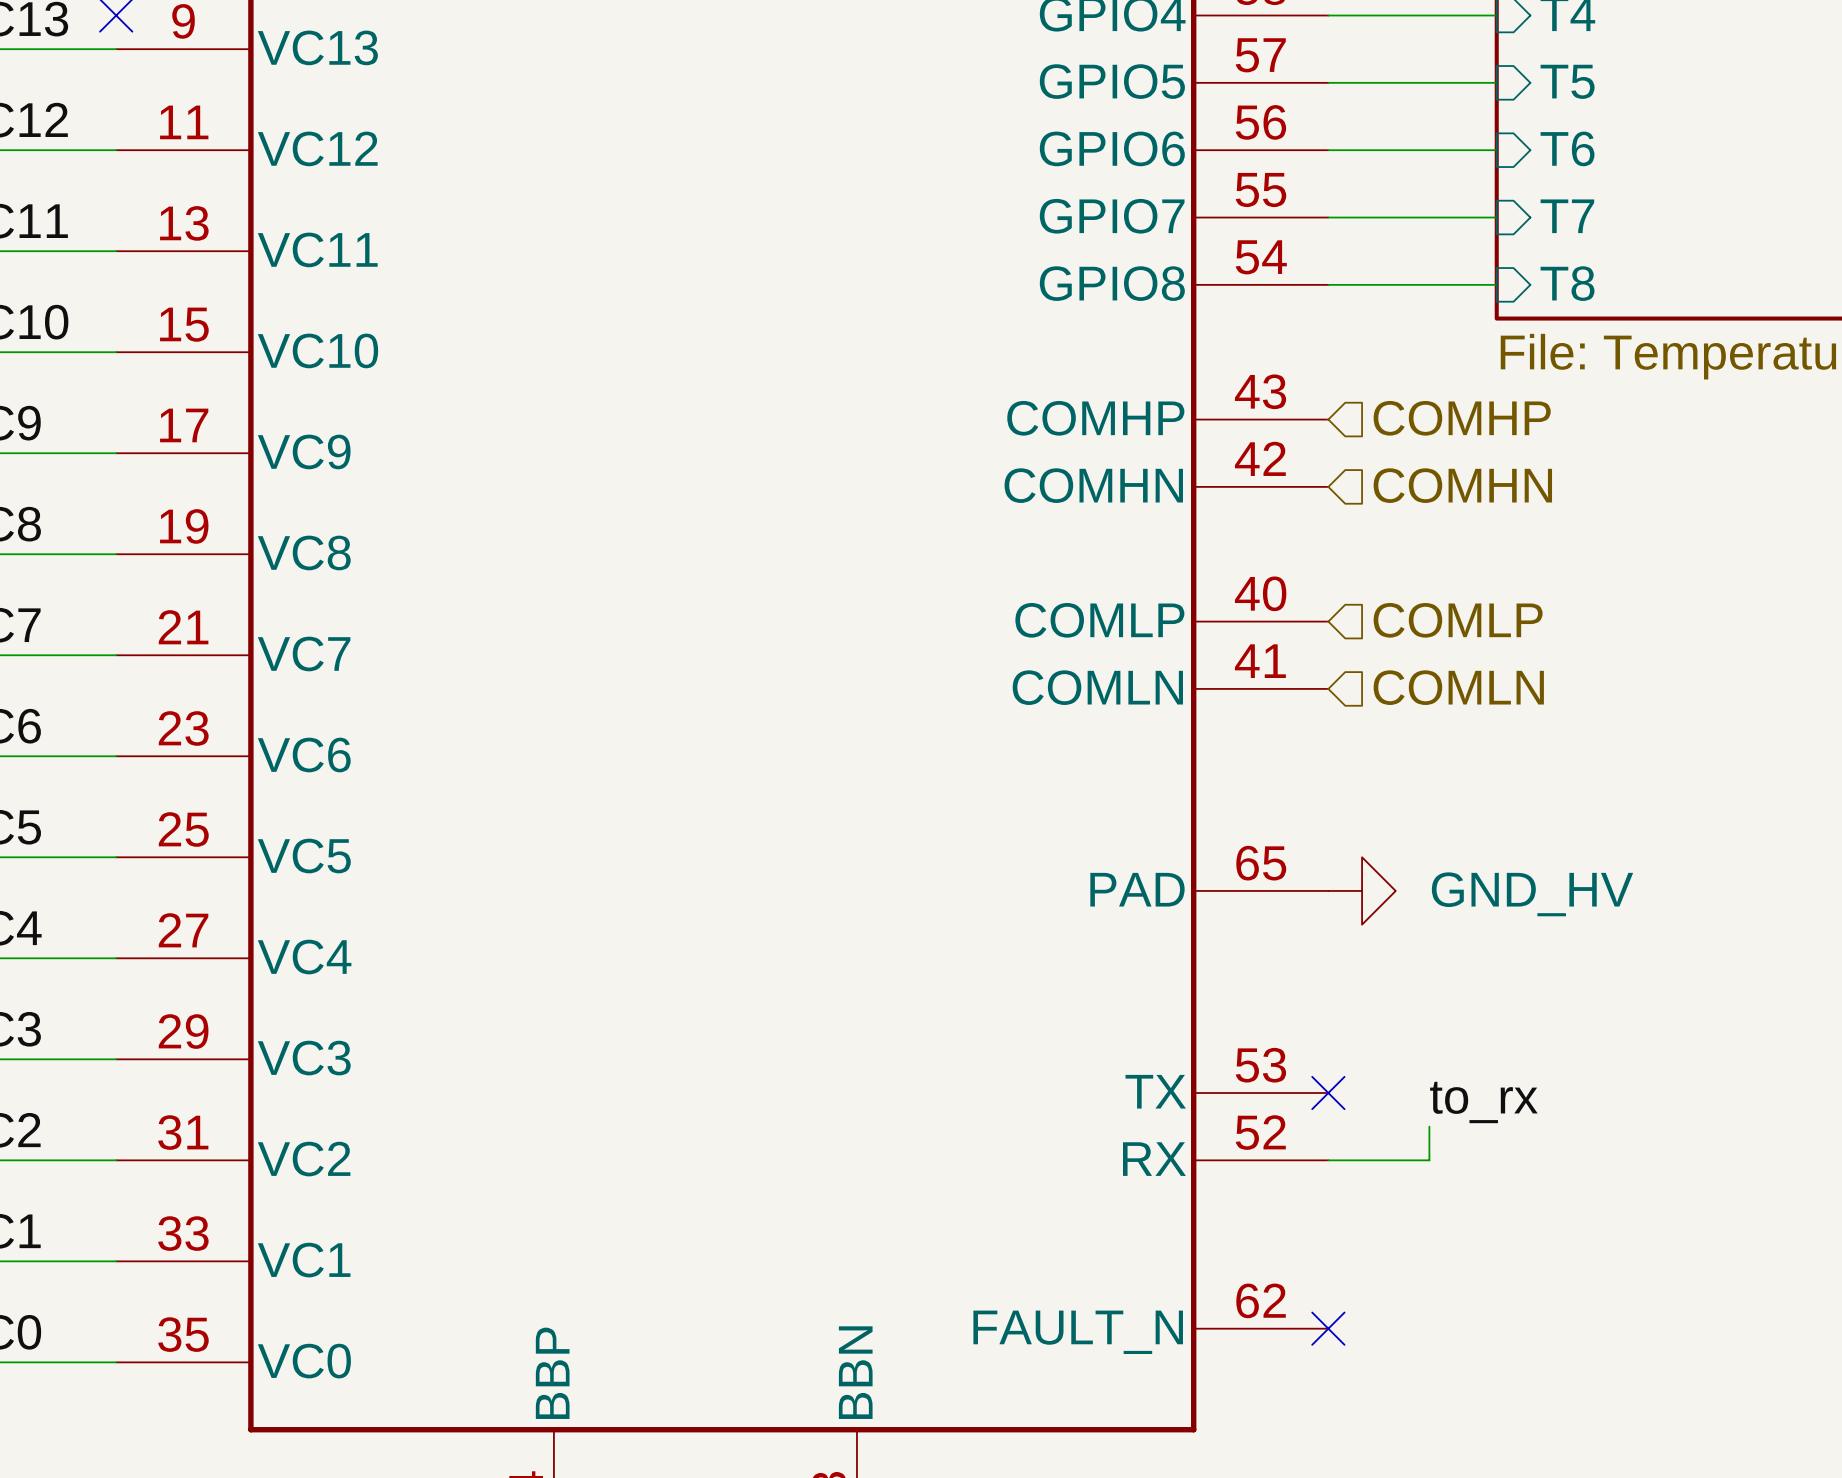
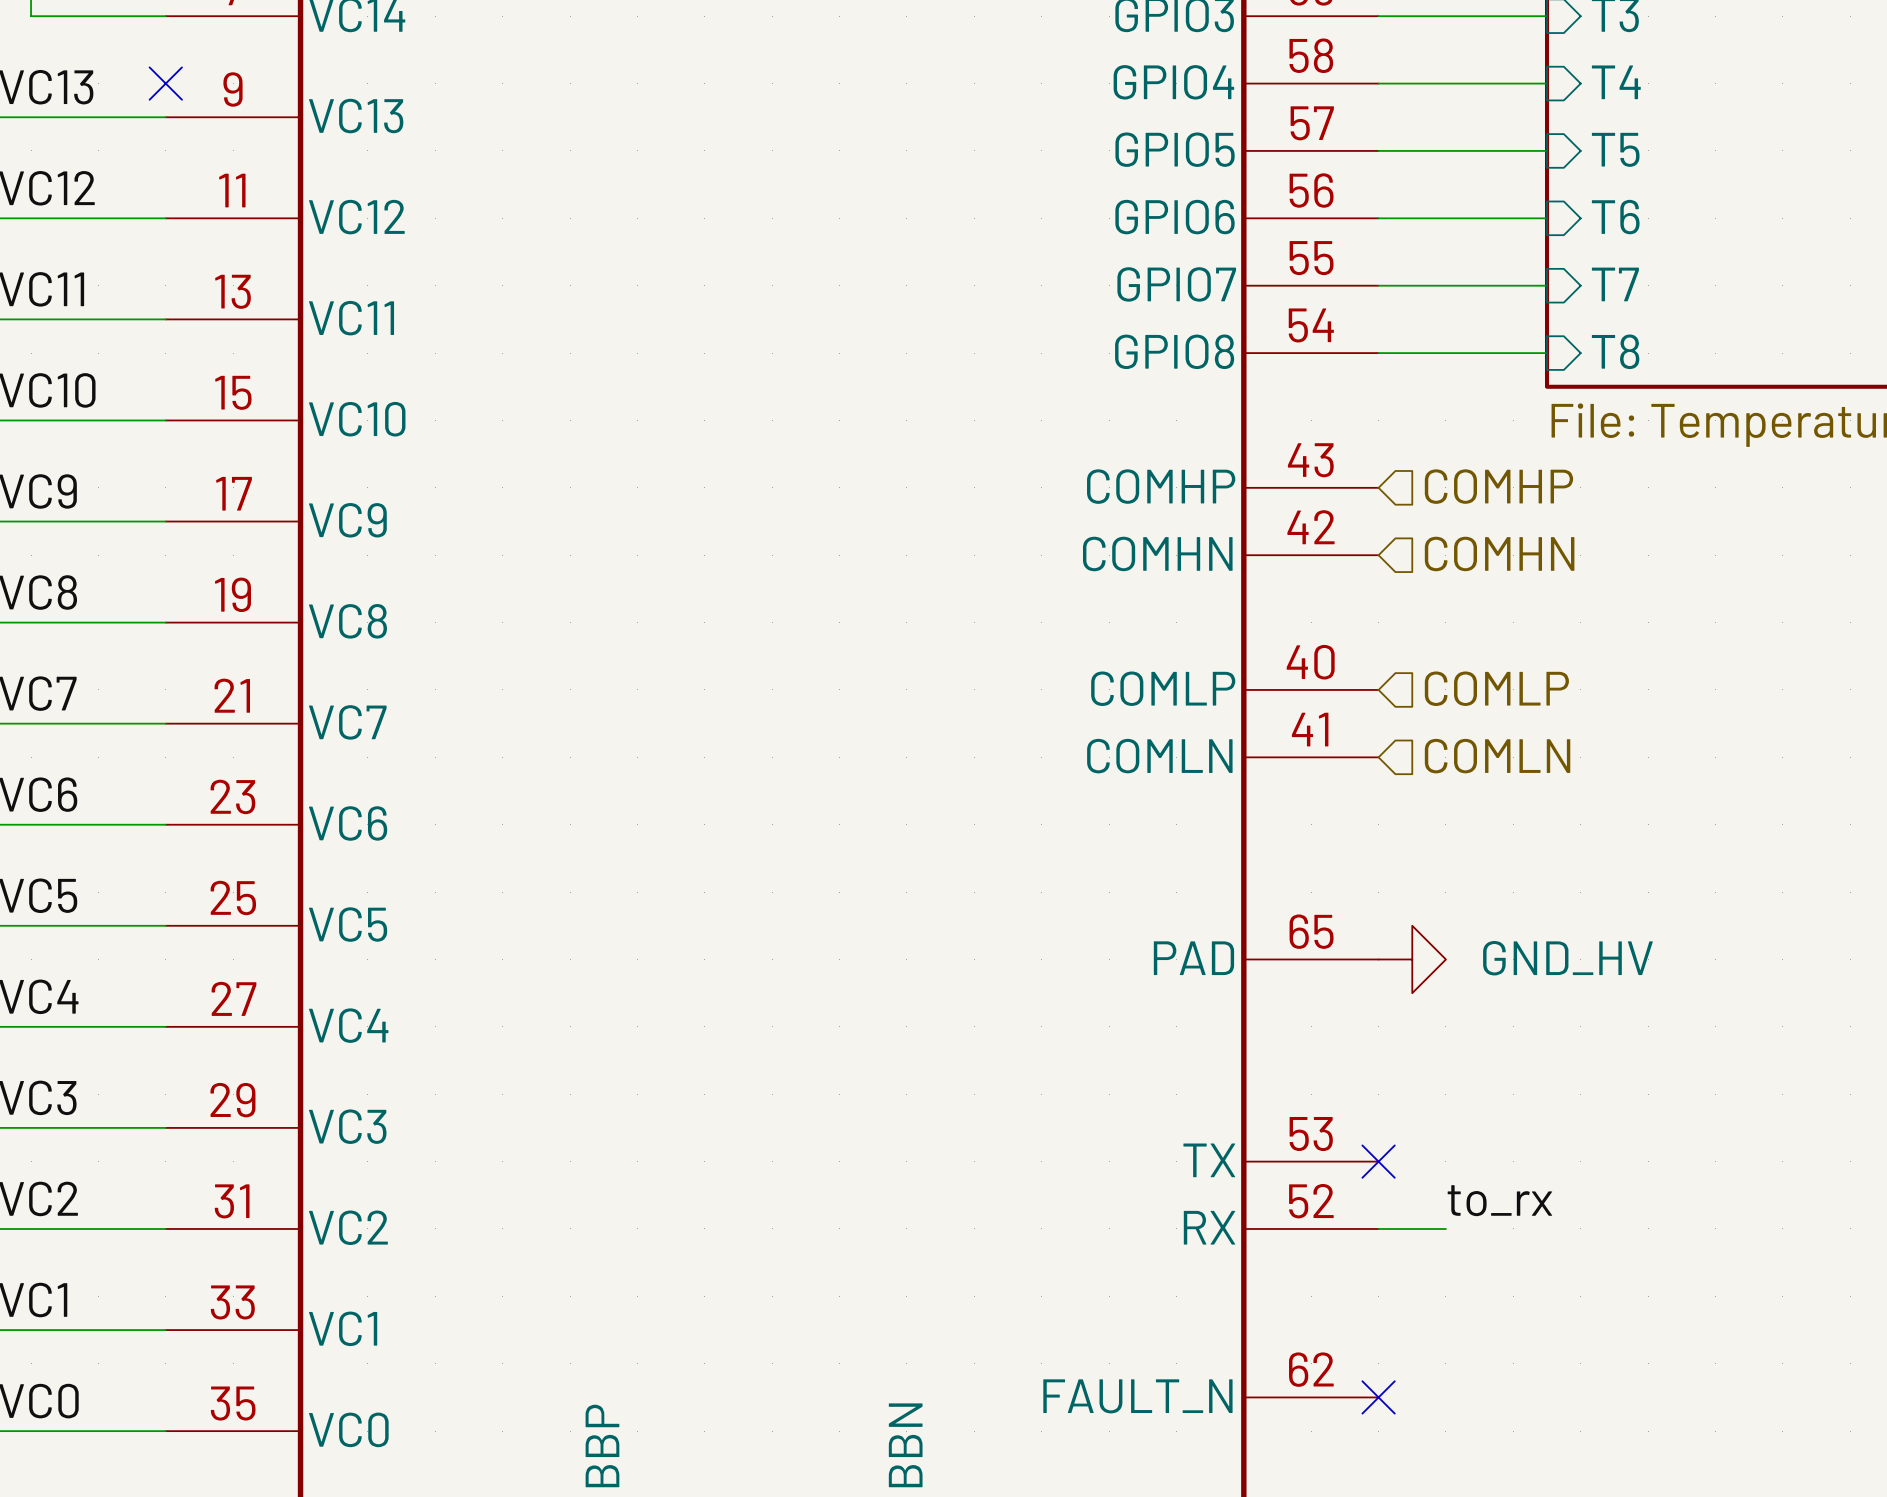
label position: to_rx (1483, 1102) -> to_rx (1499, 1200)
wire: (1429, 1126) (1429, 1160) (1395, 1160) -> none

